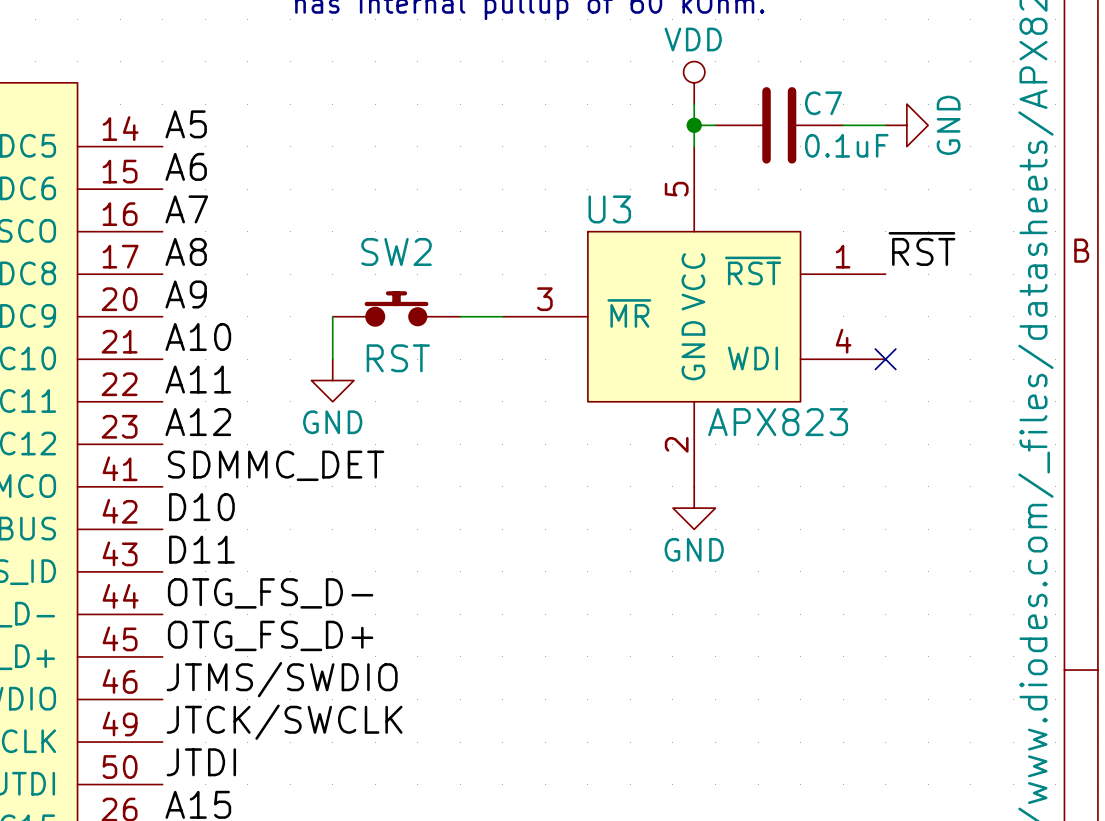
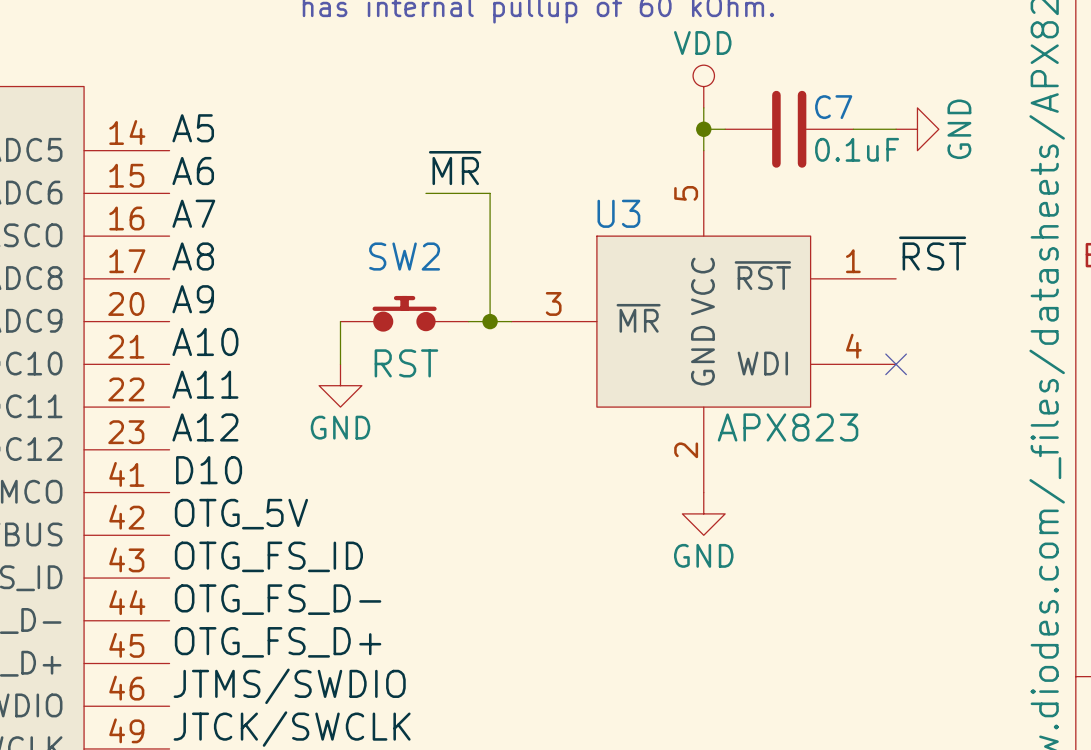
label: none -> ~{MR} (455, 168)
wire: none -> (425, 193) (490, 193) (490, 321)
junction: none -> (490, 321)
label: SDMMC_DET (276, 465) -> D10 (209, 470)
label: D10 (201, 507) -> OTG_5V (241, 514)
label: D11 (201, 549) -> OTG_FS_ID (268, 556)

